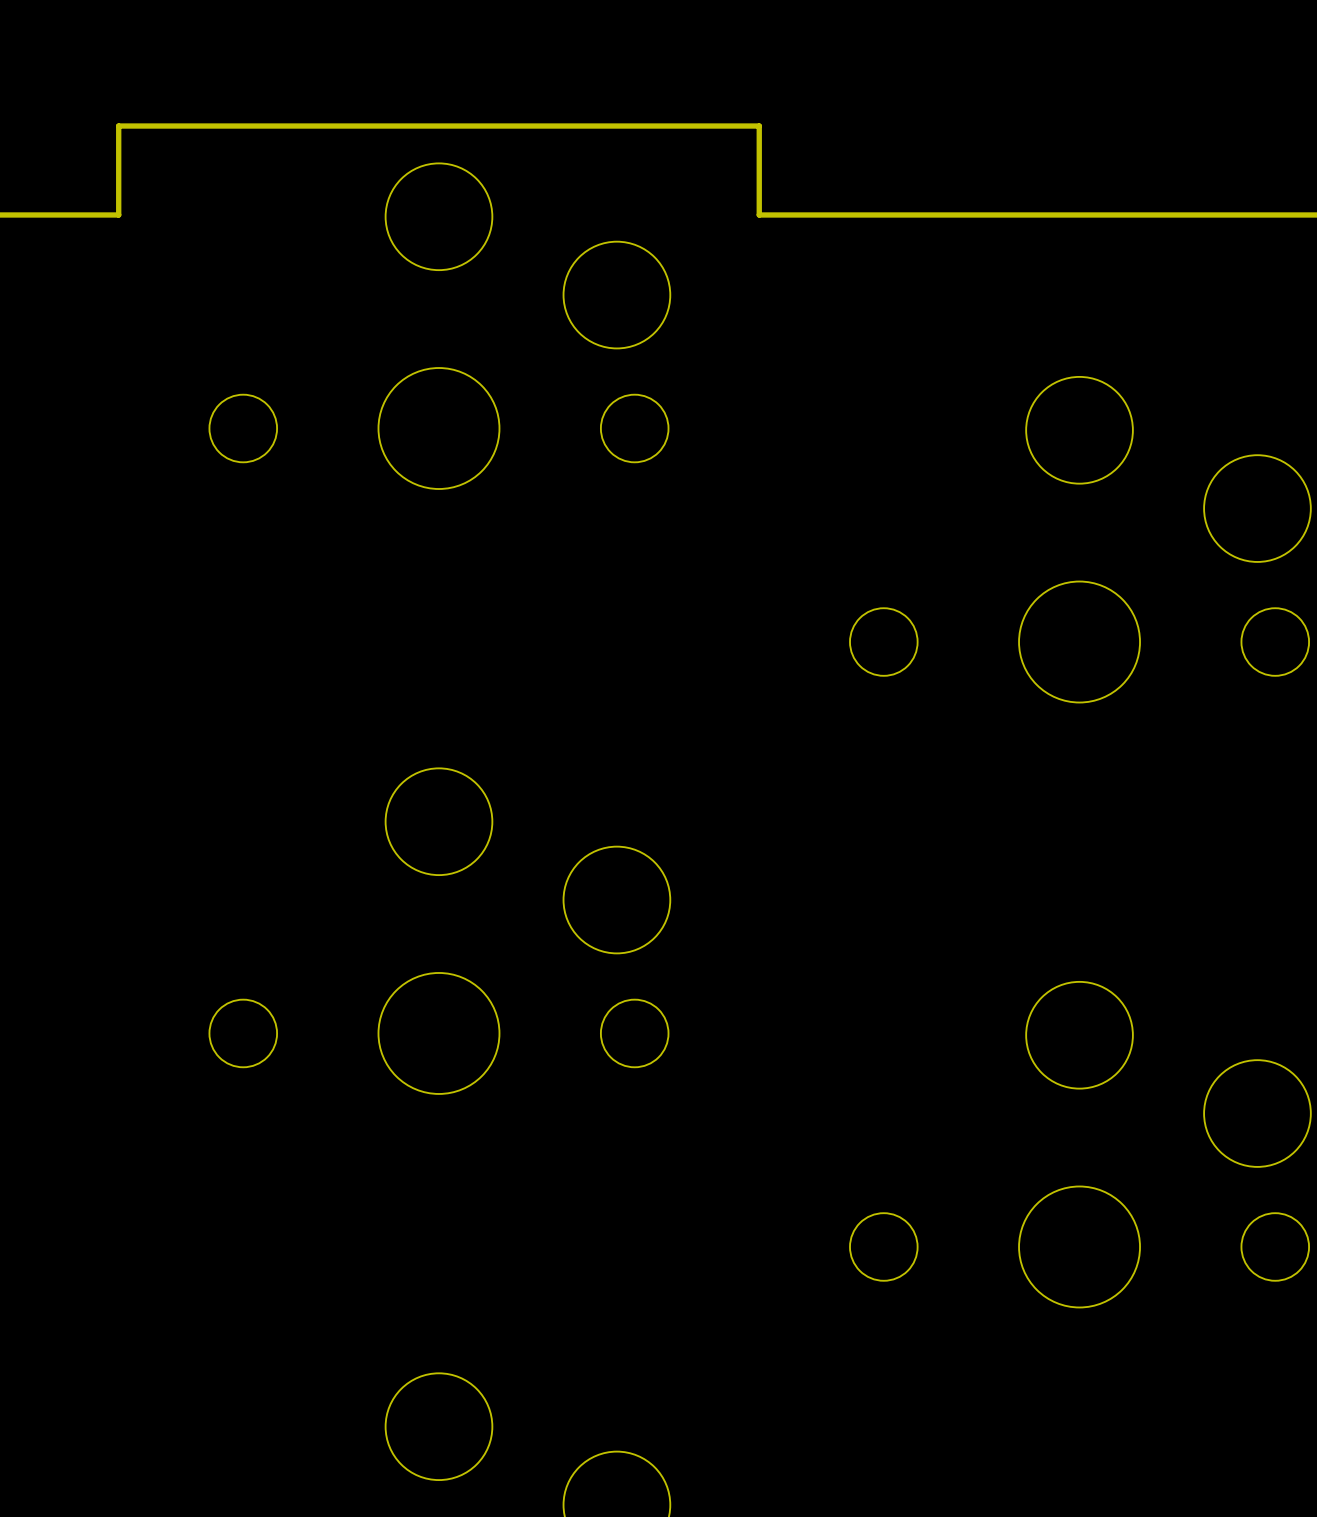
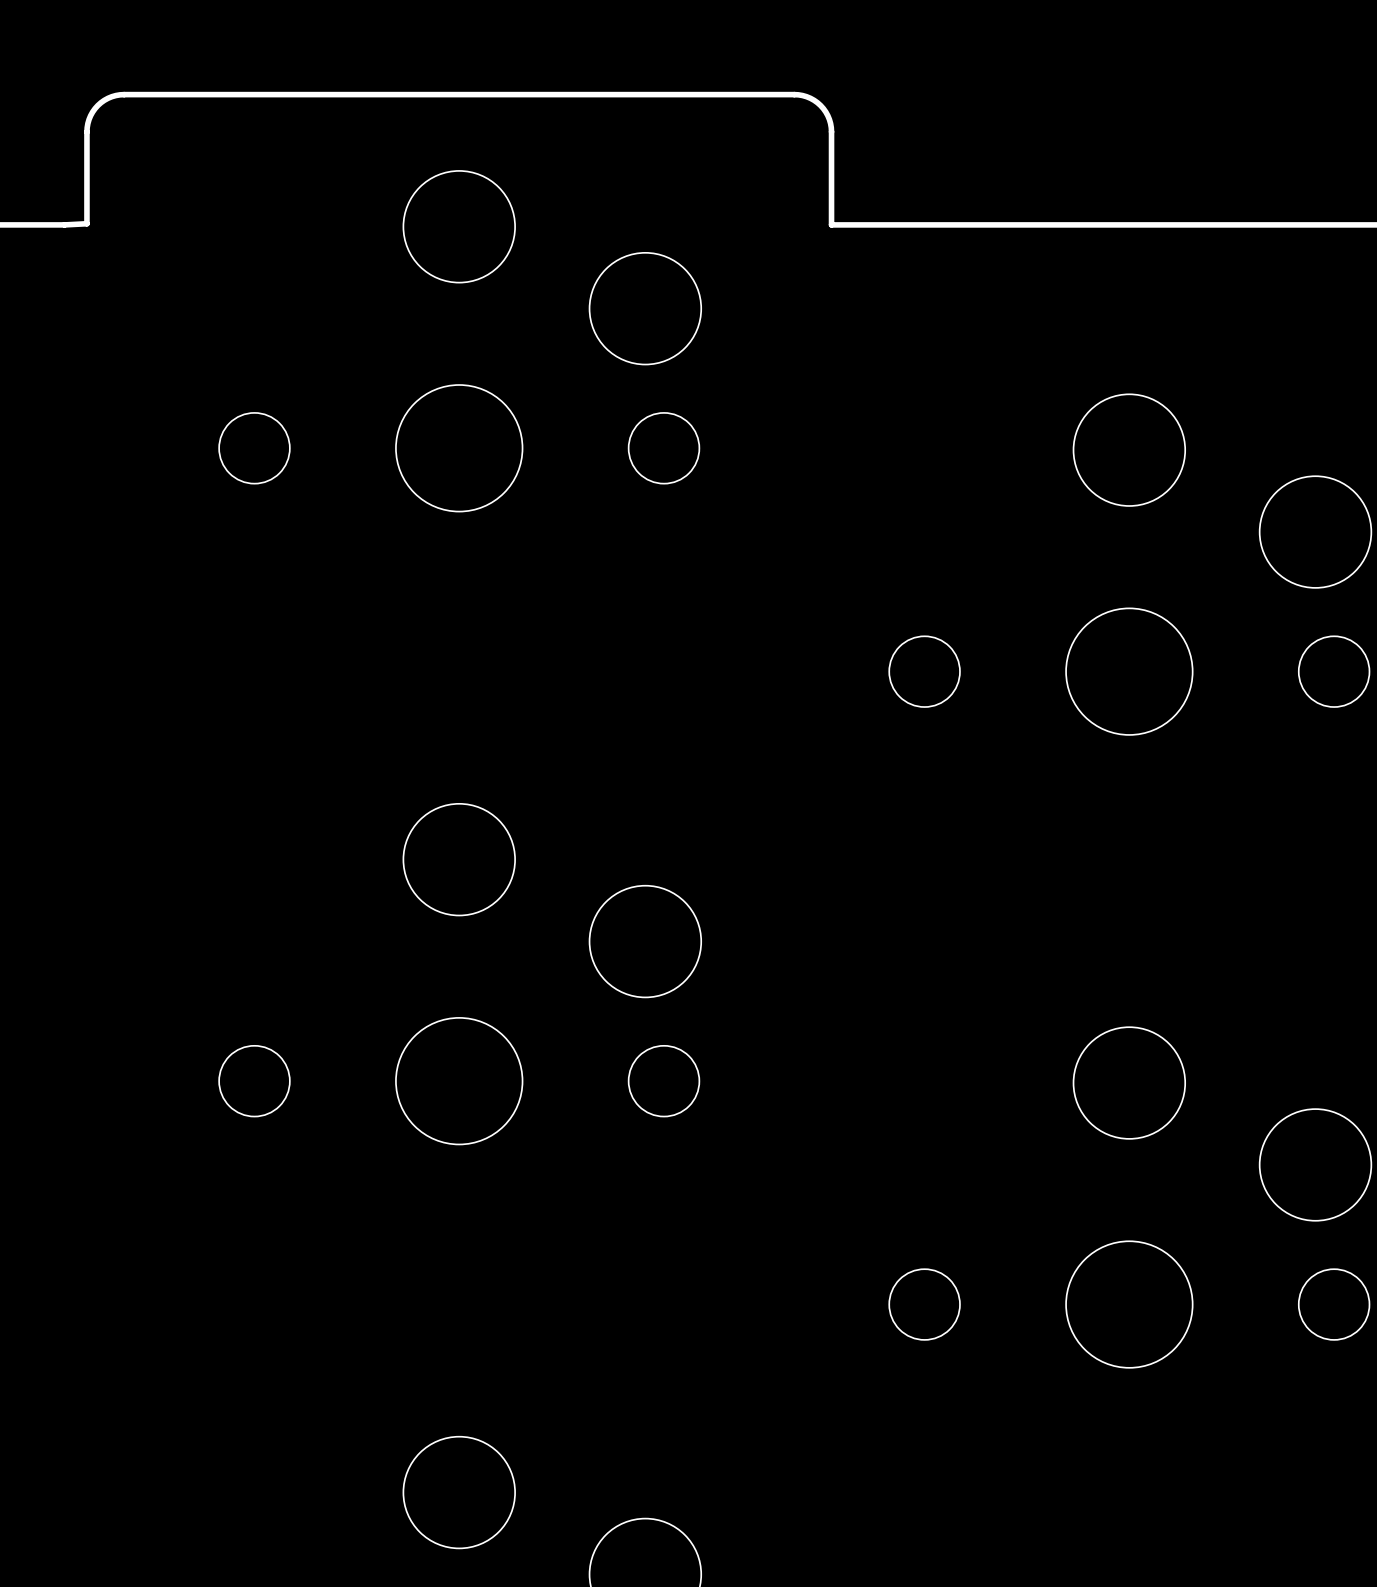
board edge: (61, 214) (118, 214) (118, 126) (759, 126) (759, 214) (794, 214) -> (64, 224) (86, 223) (86, 131) (90, 115) (104, 100) (124, 94) (802, 95) (820, 105) (830, 123) (831, 224)

